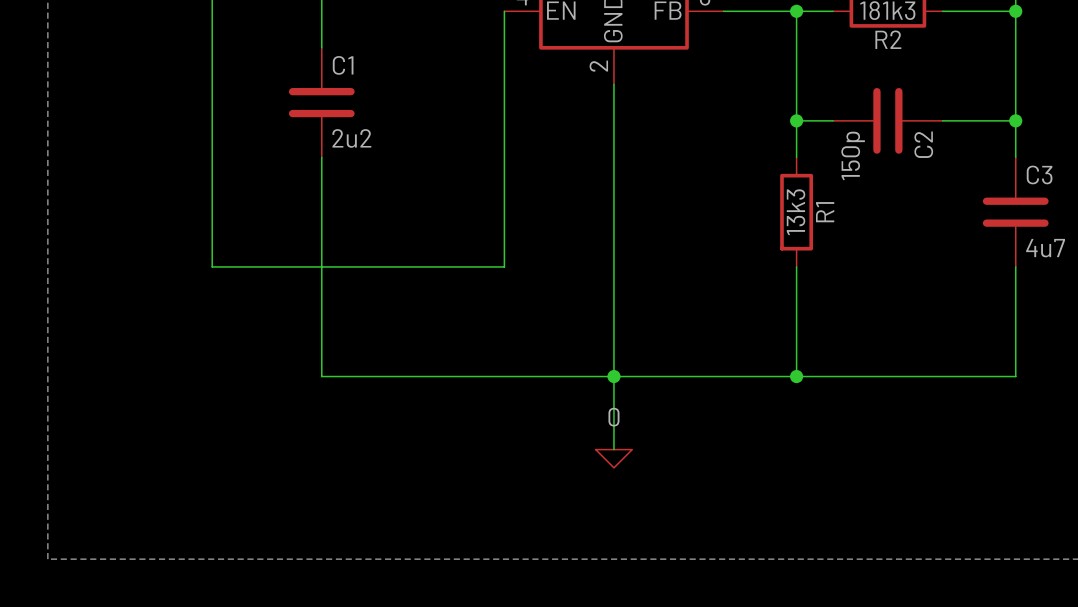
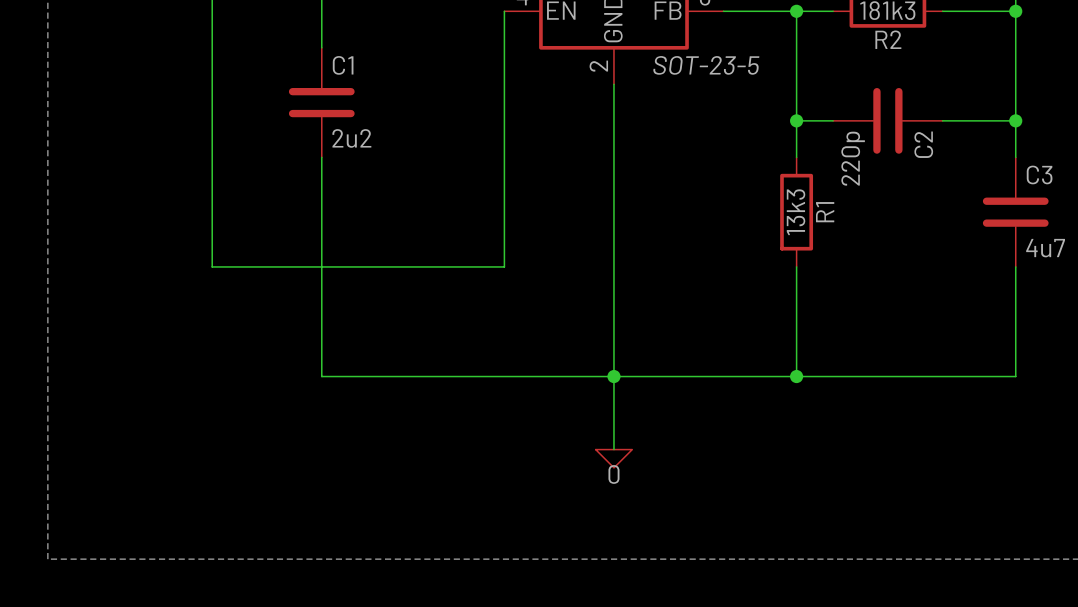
part text: none -> SOT-23-5 (706, 65)
C2 value: 150p (853, 155) -> 220p (853, 158)
power symbol text position: 0 (613, 417) -> 0 (613, 474)

